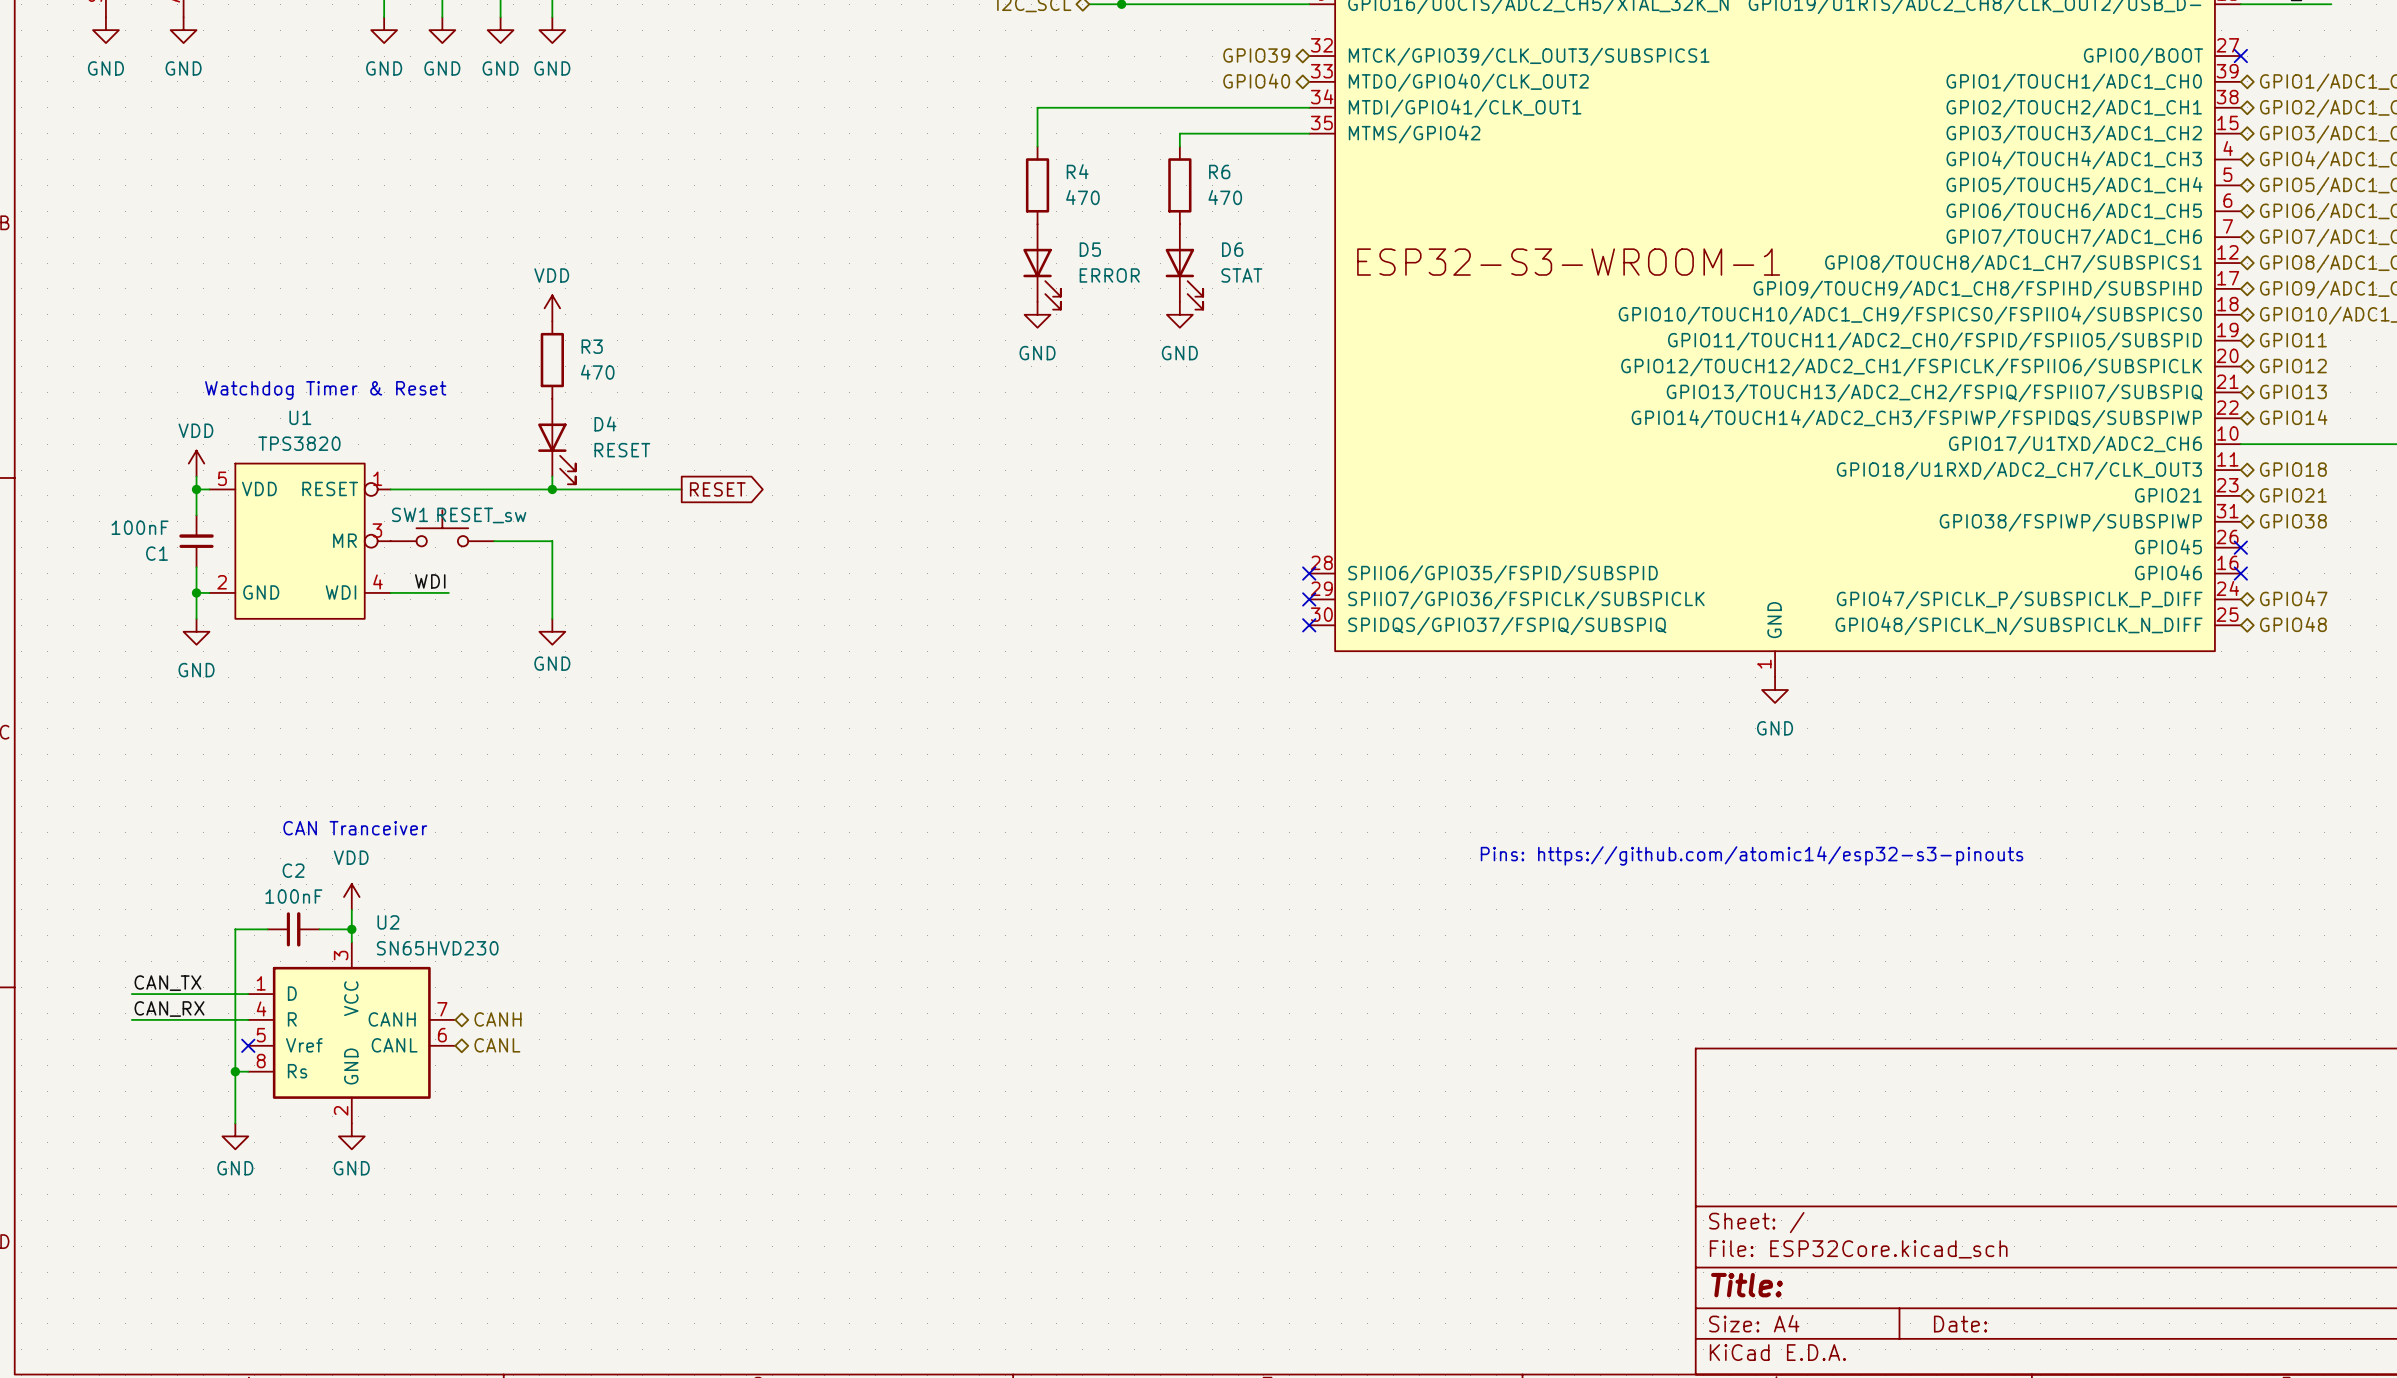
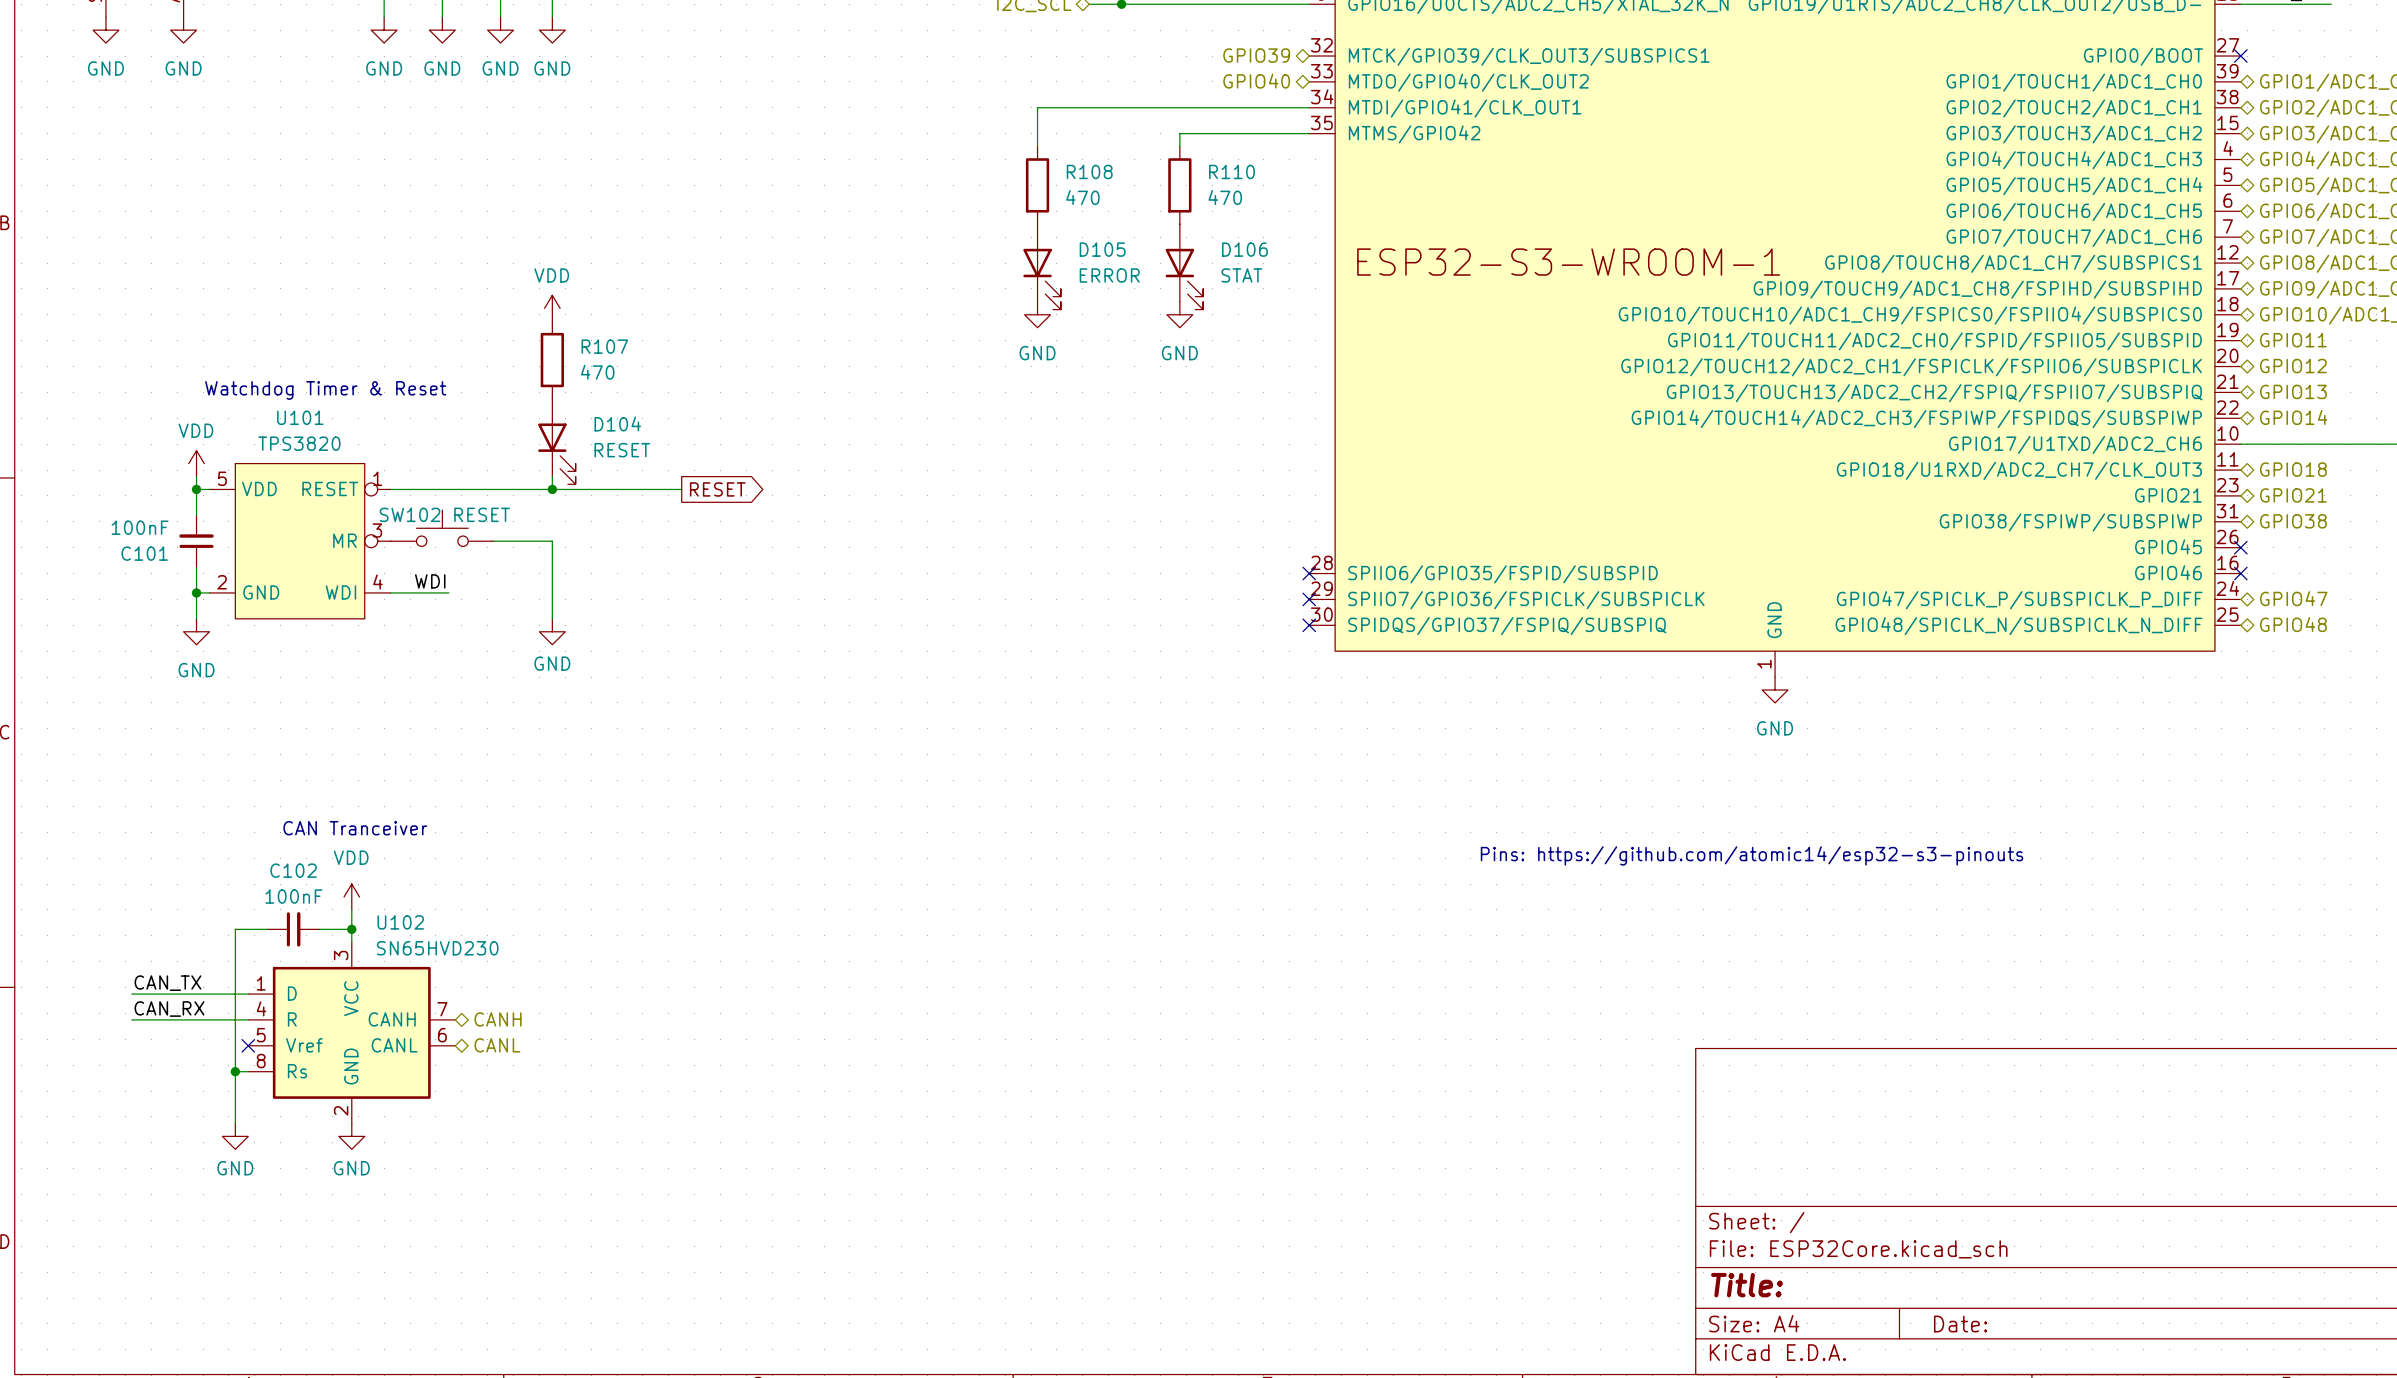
R4 name: R4 (1077, 171) -> R108 (1089, 171)
R6 name: R6 (1219, 171) -> R110 (1232, 171)
D5 name: D5 (1090, 249) -> D105 (1102, 249)
D6 name: D6 (1232, 249) -> D106 (1244, 249)
R3 name: R3 (592, 346) -> R107 (604, 346)
U1 name: U1 (300, 417) -> U101 (300, 417)
D4 name: D4 (605, 423) -> D104 (617, 423)
SW1 name: SW1 (410, 514) -> SW102 (410, 514)
SW1 value: RESET_sw (481, 515) -> RESET (482, 514)
C1 name: C1 (157, 553) -> C101 (144, 553)
C2 name: C2 (293, 870) -> C102 (293, 870)
U2 name: U2 (388, 922) -> U102 (400, 922)

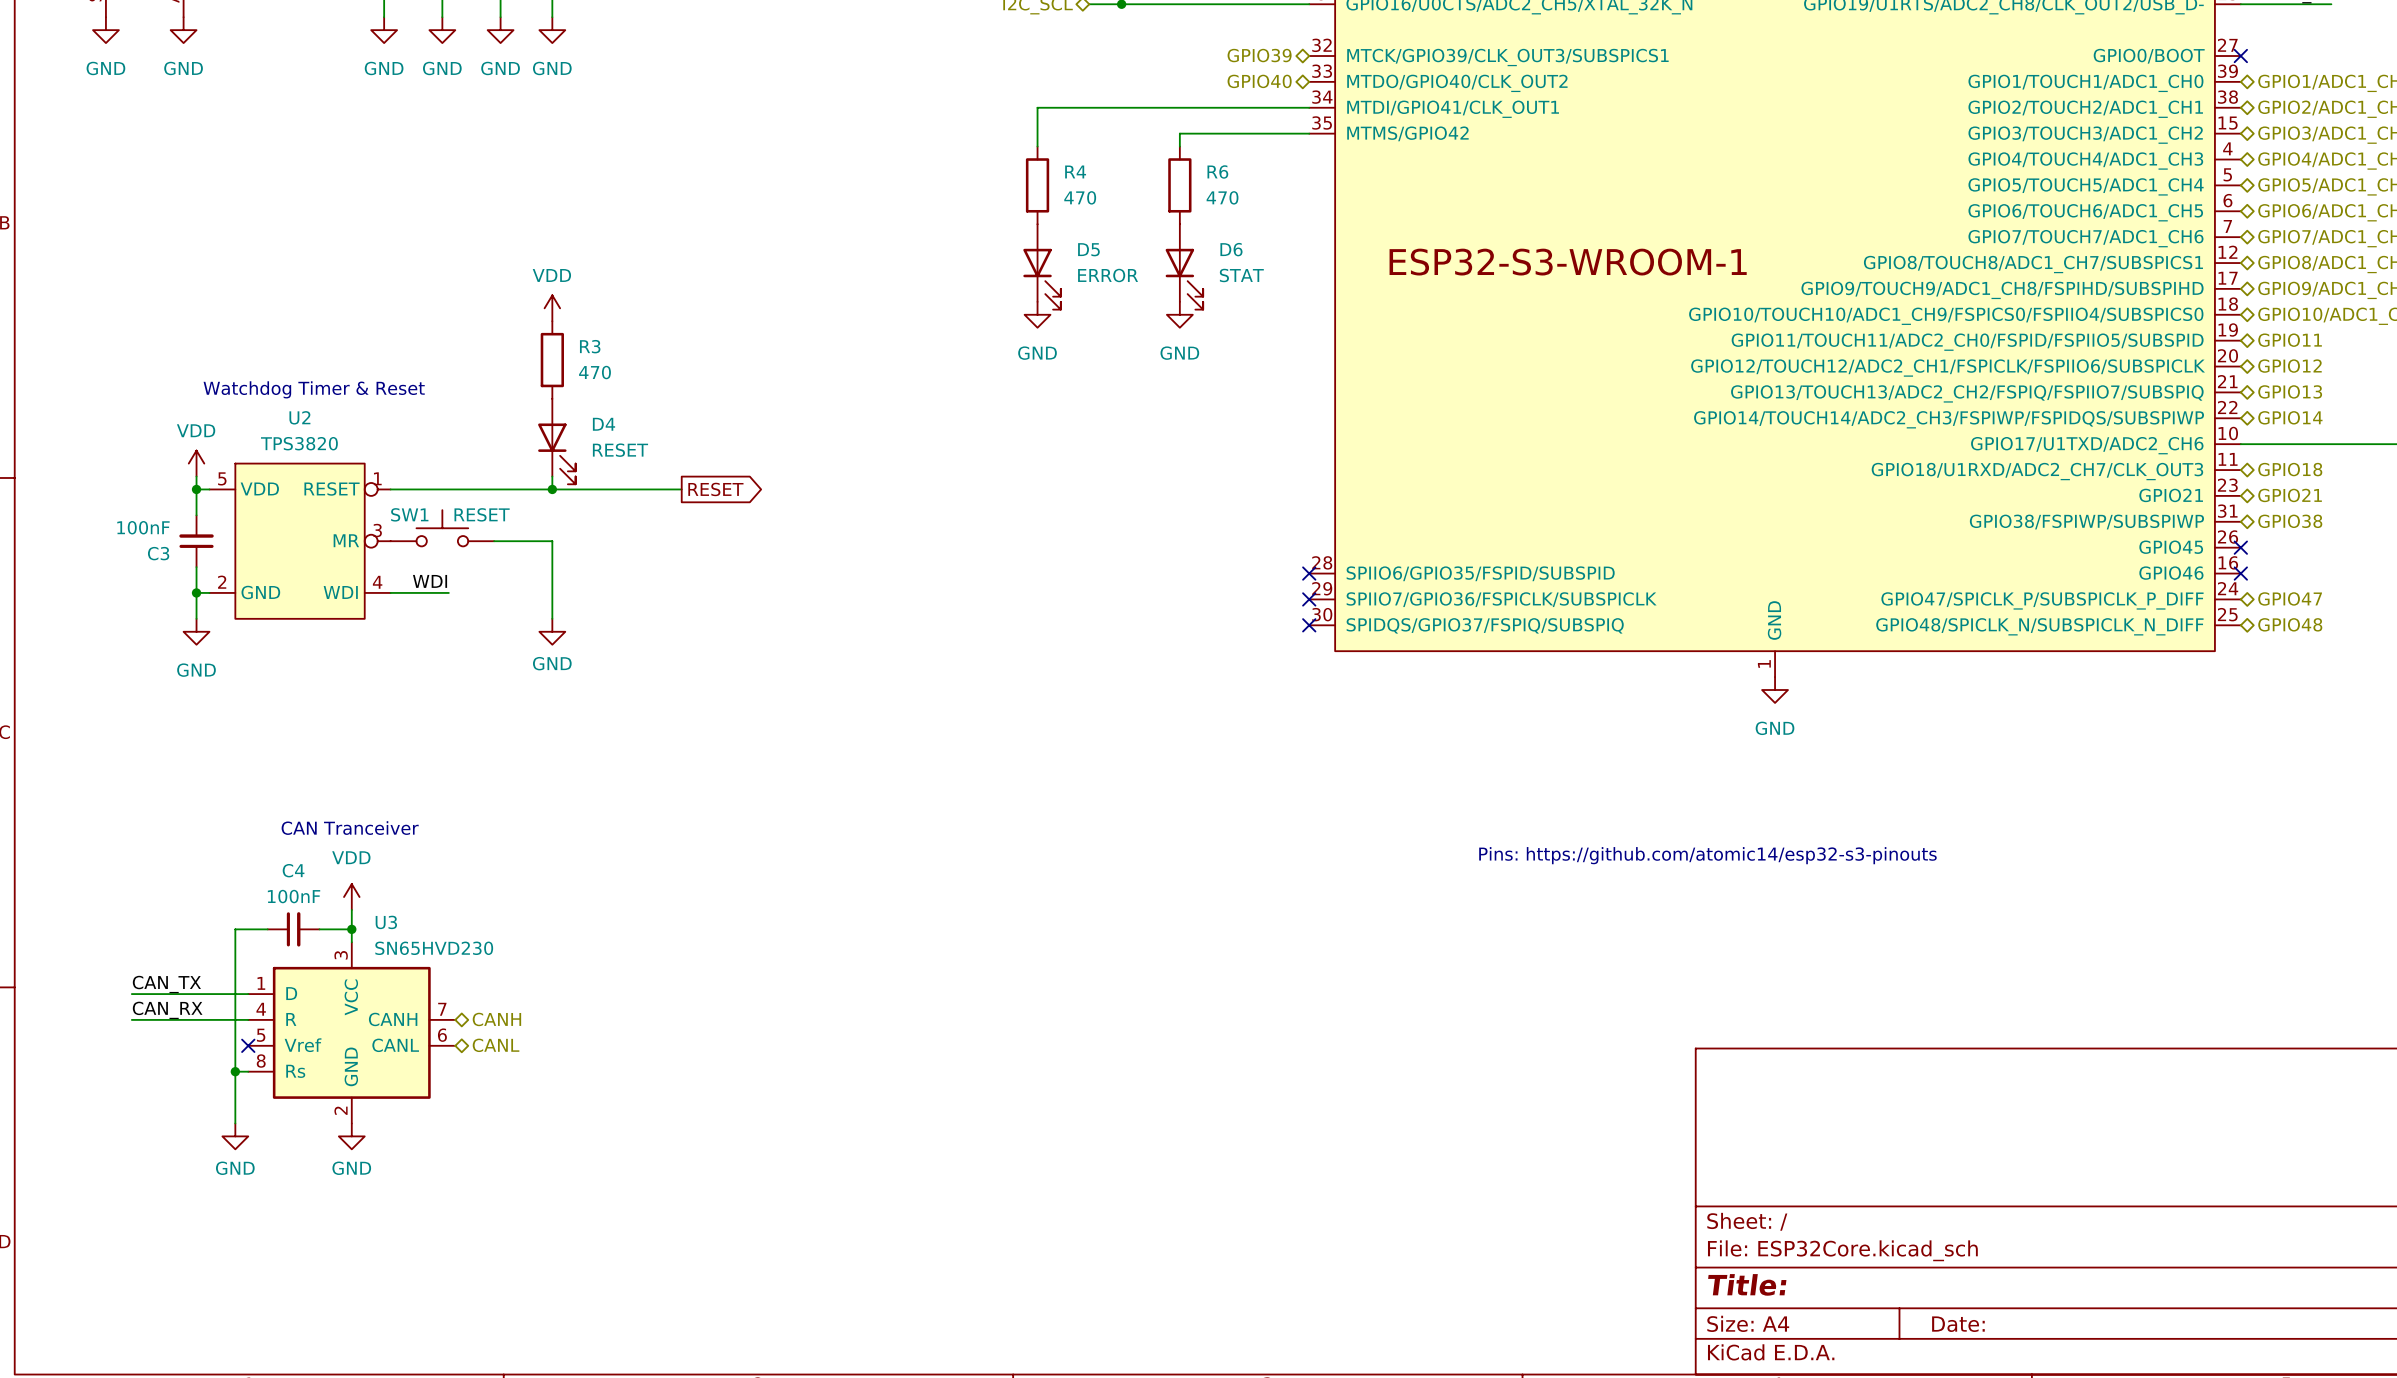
R108 name: R108 (1089, 171) -> R4 (1075, 171)
R110 name: R110 (1232, 171) -> R6 (1217, 171)
D105 name: D105 (1102, 249) -> D5 (1088, 249)
D106 name: D106 (1244, 249) -> D6 (1231, 249)
R107 name: R107 (604, 346) -> R3 (590, 346)
U101 name: U101 (300, 417) -> U2 (299, 417)
D104 name: D104 (617, 423) -> D4 (604, 424)
SW102 name: SW102 (410, 514) -> SW1 (409, 514)
C101 name: C101 (144, 553) -> C3 (158, 553)
C102 name: C102 (293, 870) -> C4 (293, 870)
U102 name: U102 (400, 922) -> U3 (386, 922)

